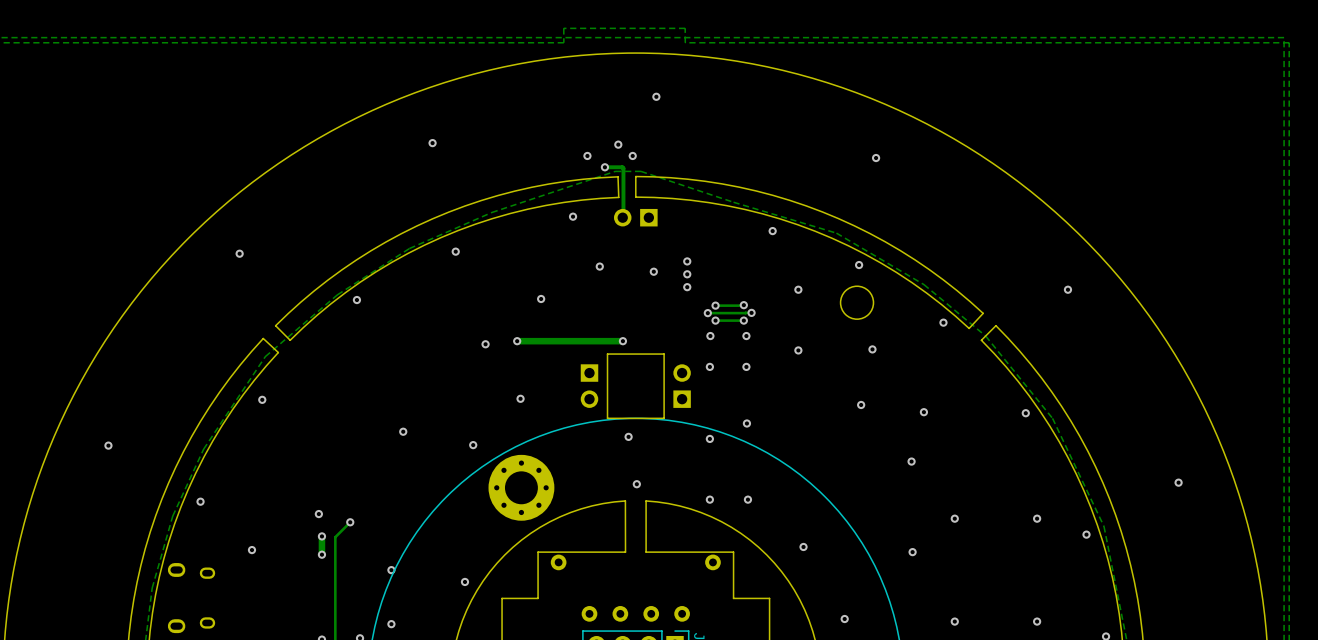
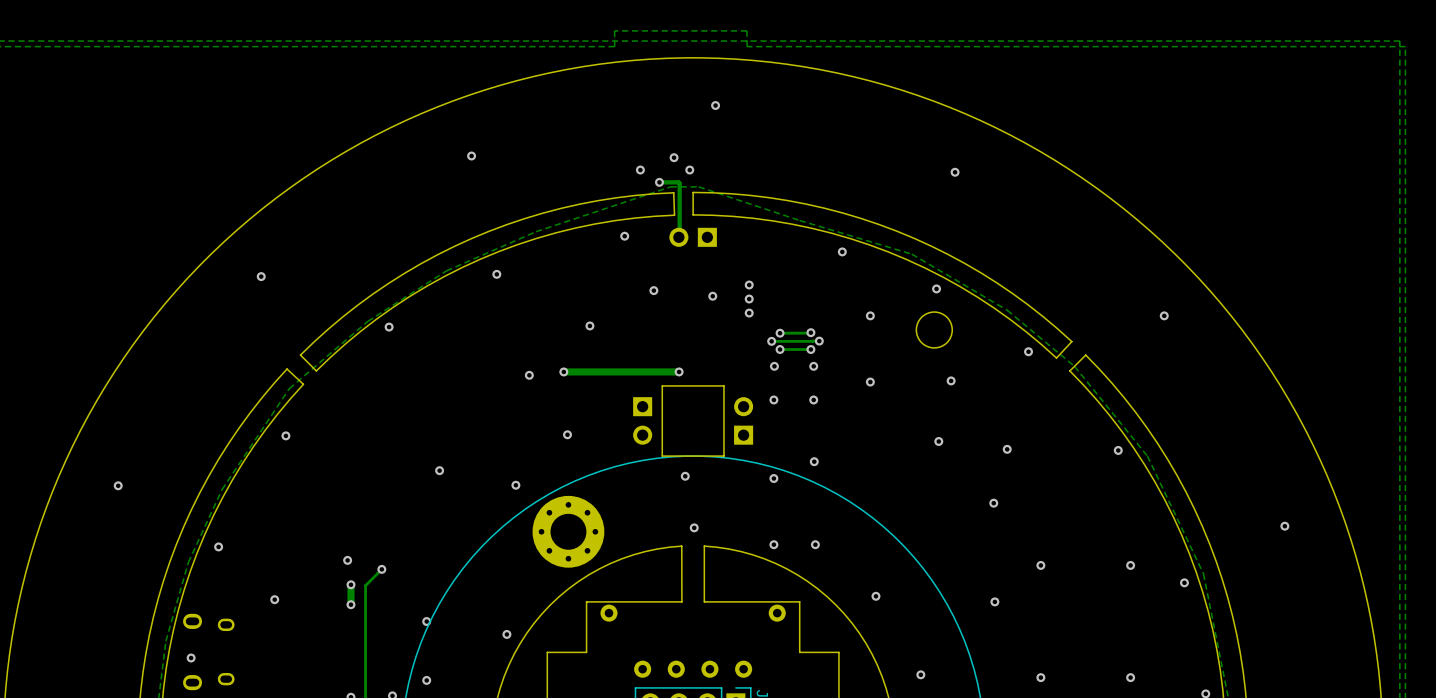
via: none -> (191, 657)

